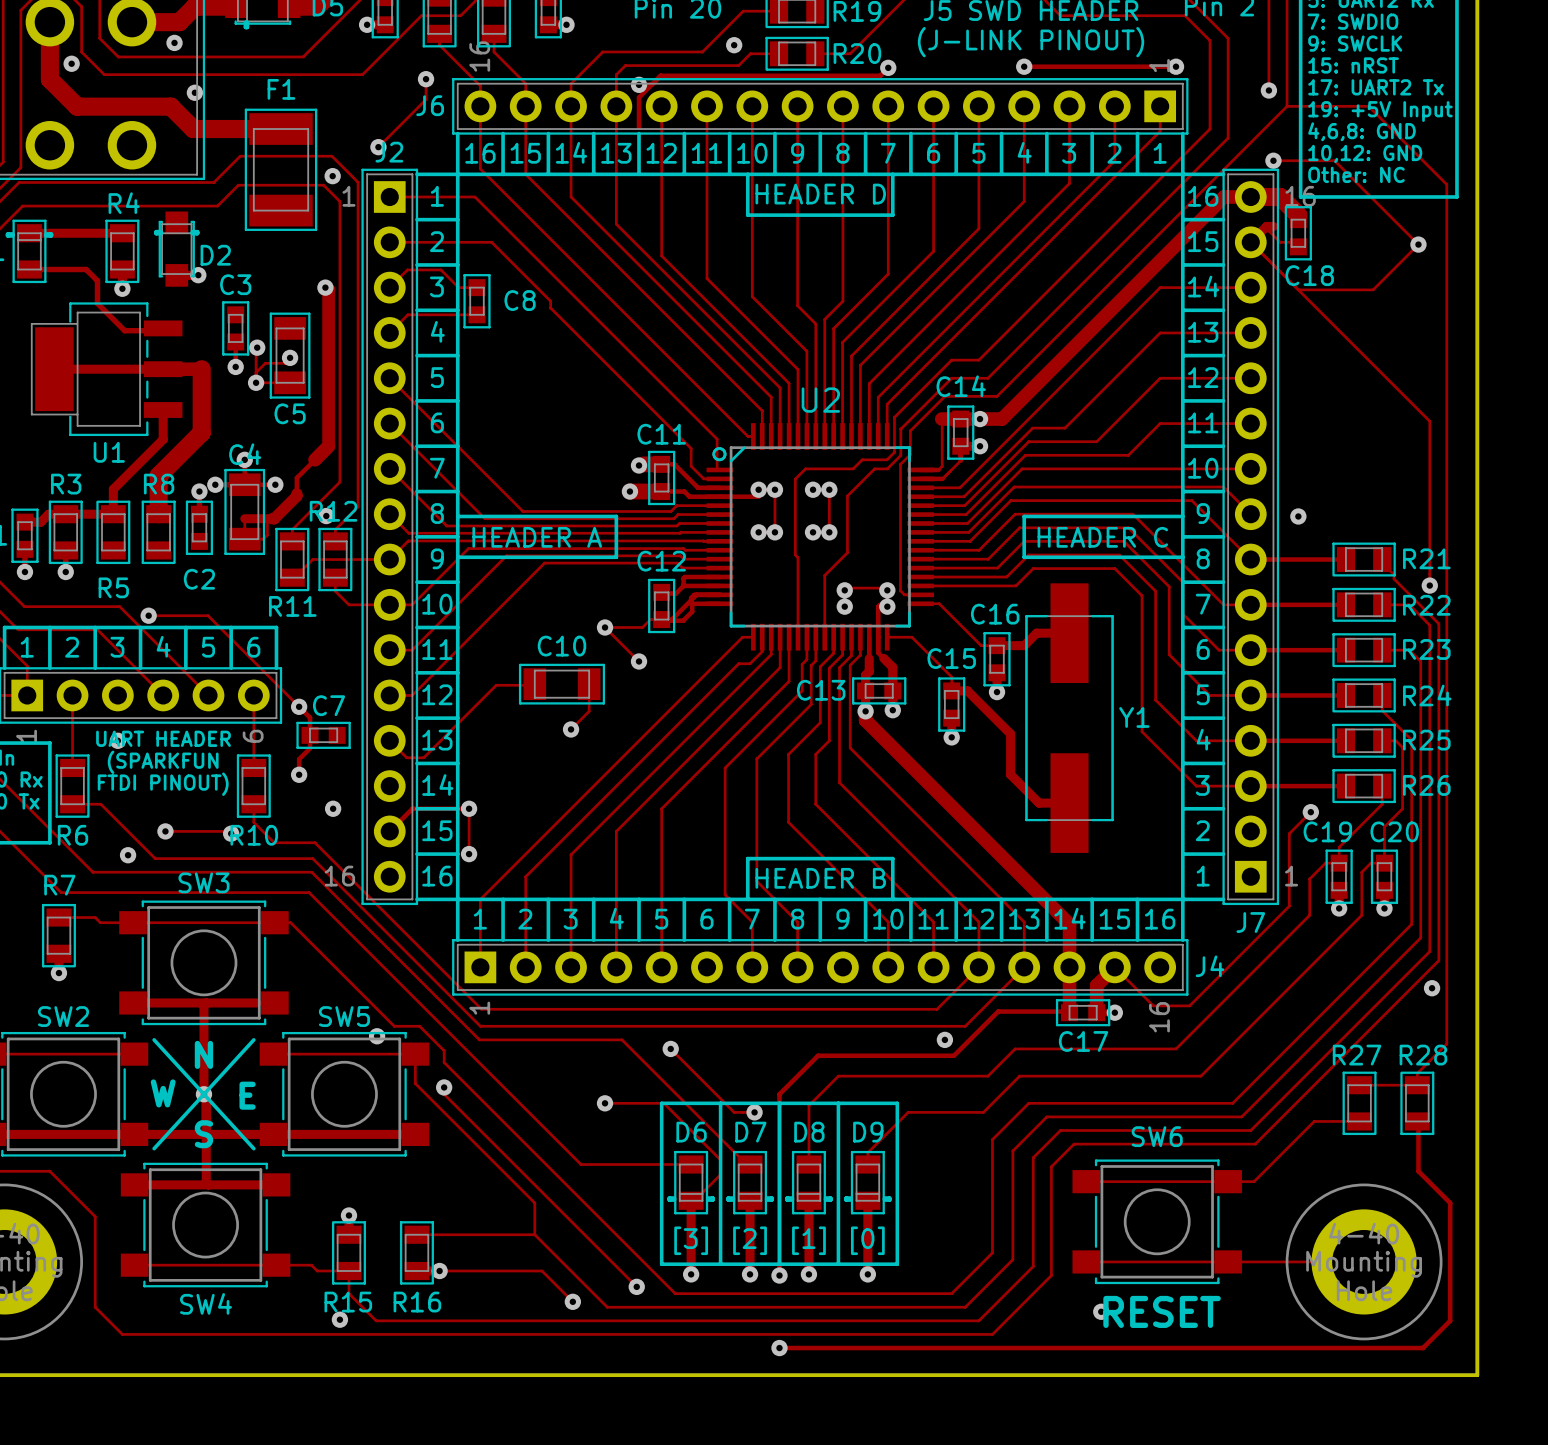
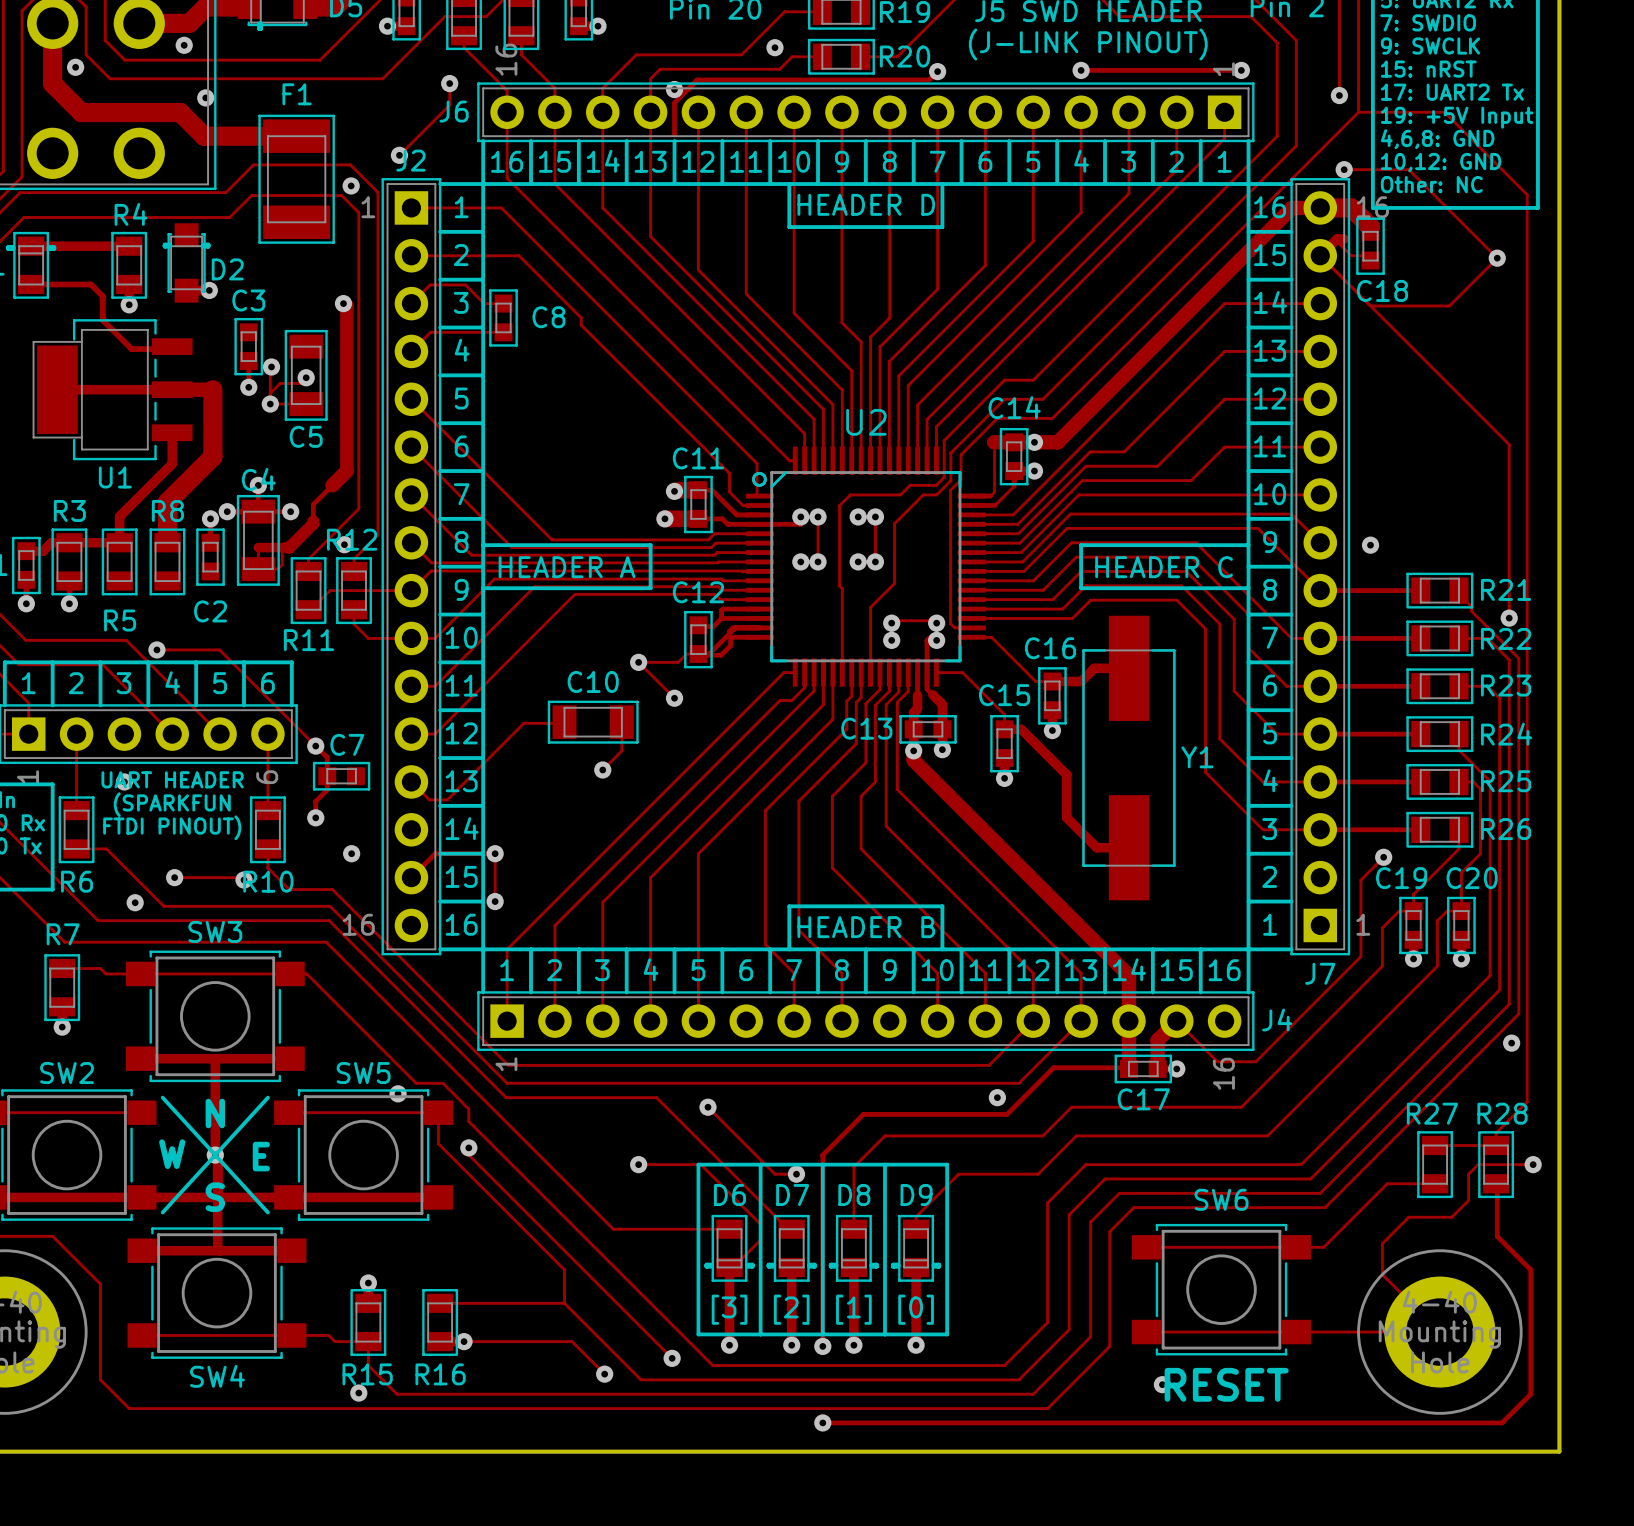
track: none -> (1533, 1164) (1478, 1164) (1468, 1174) (1468, 1200) (1451, 1217) (1408, 1217) (1382, 1243) (1382, 1274) (1439, 1332)
via: none -> (1533, 1164)

